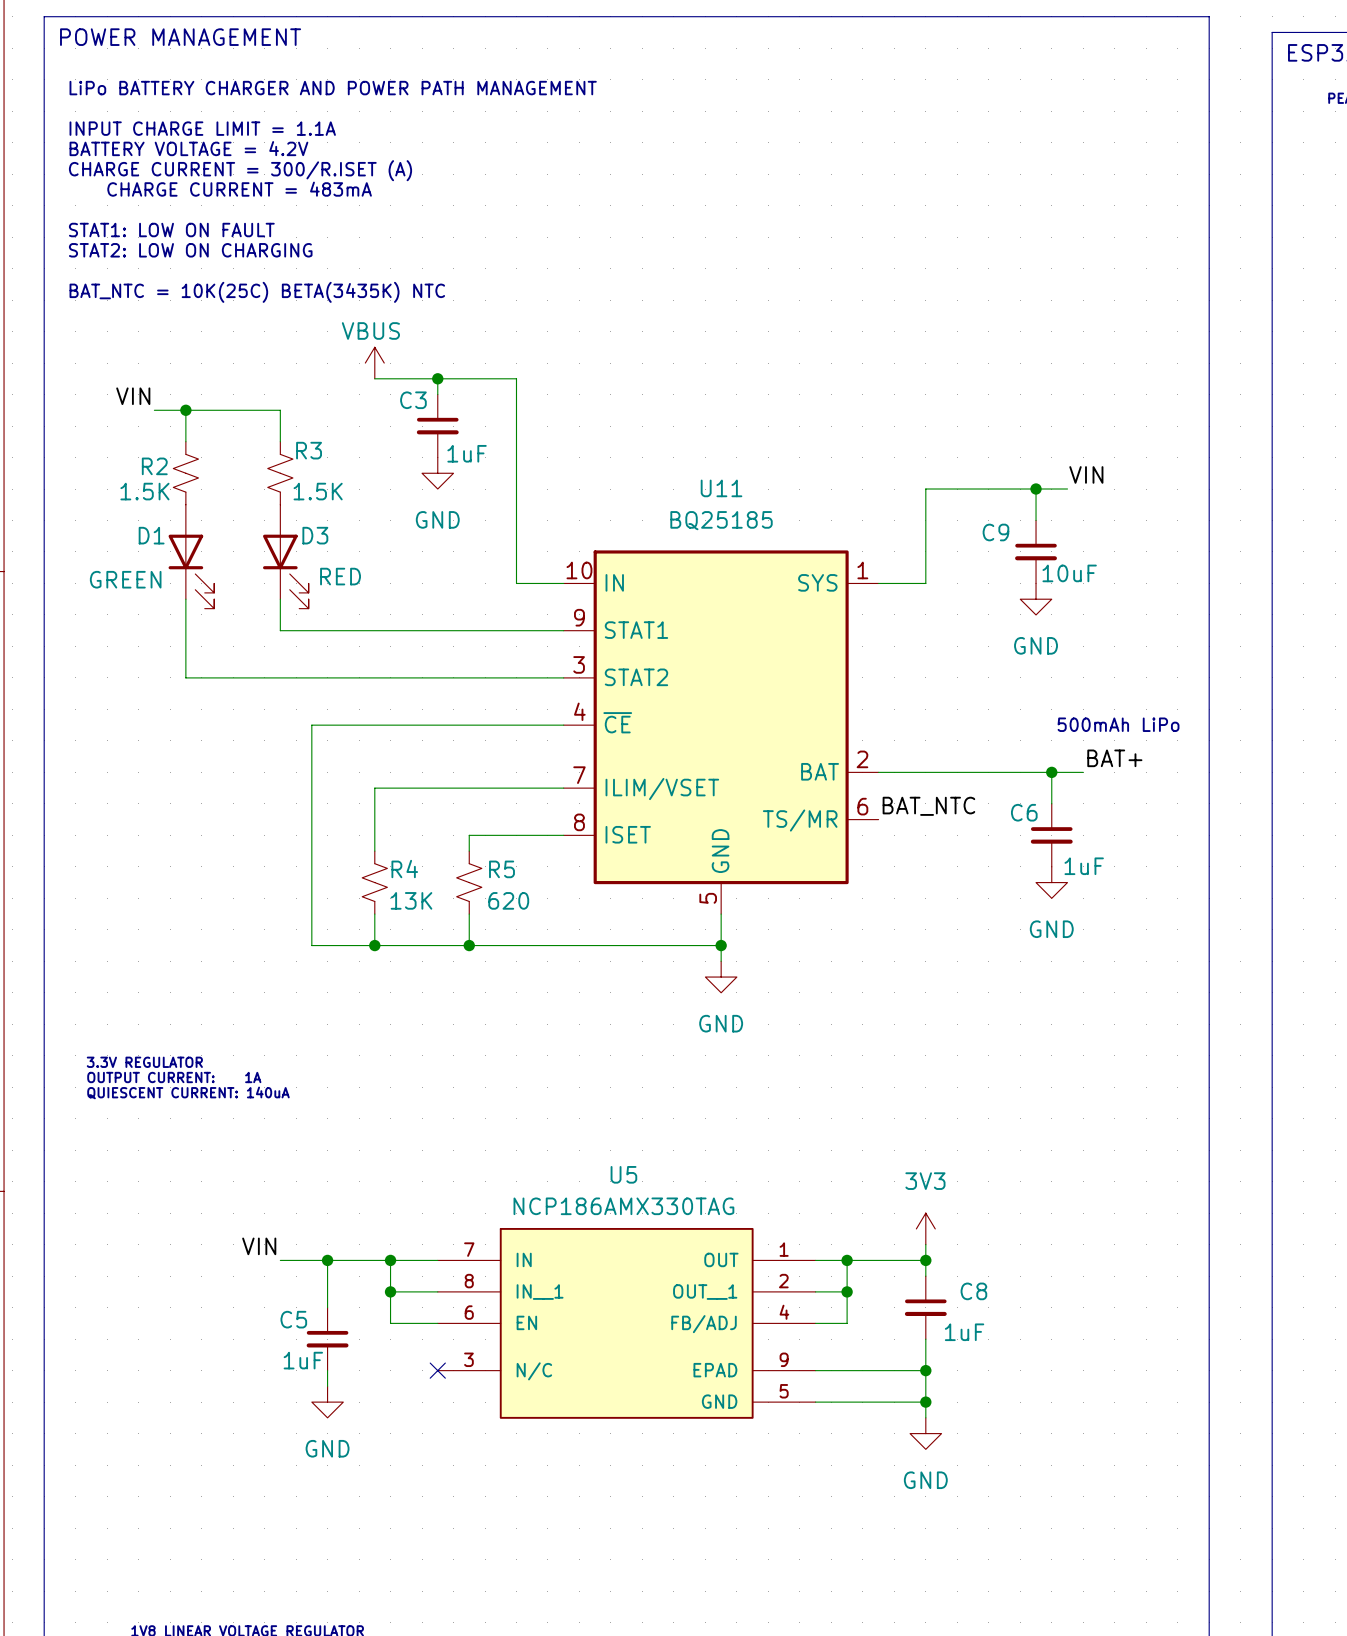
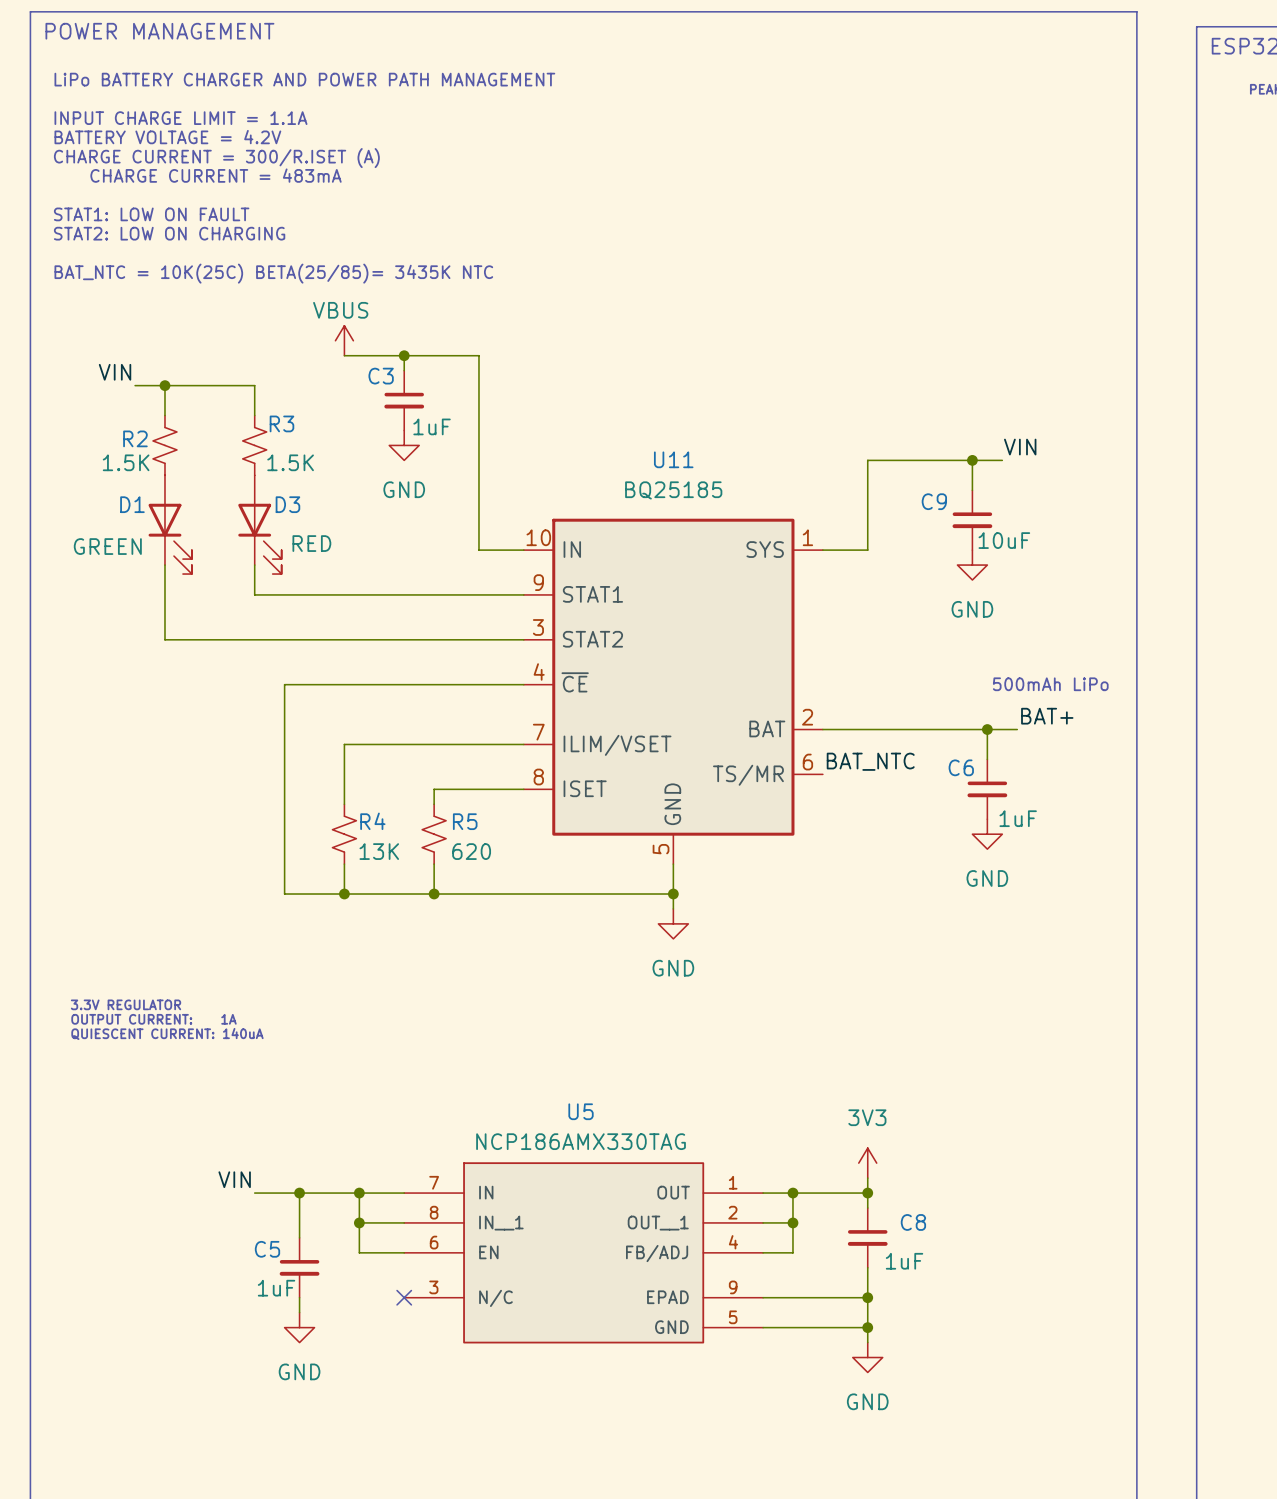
text: BAT_NTC = 10K(25C) BETA(3435K) NTC (257, 292) -> BAT_NTC = 10K(25C) BETA(25/85)= 3435K NTC (273, 273)

